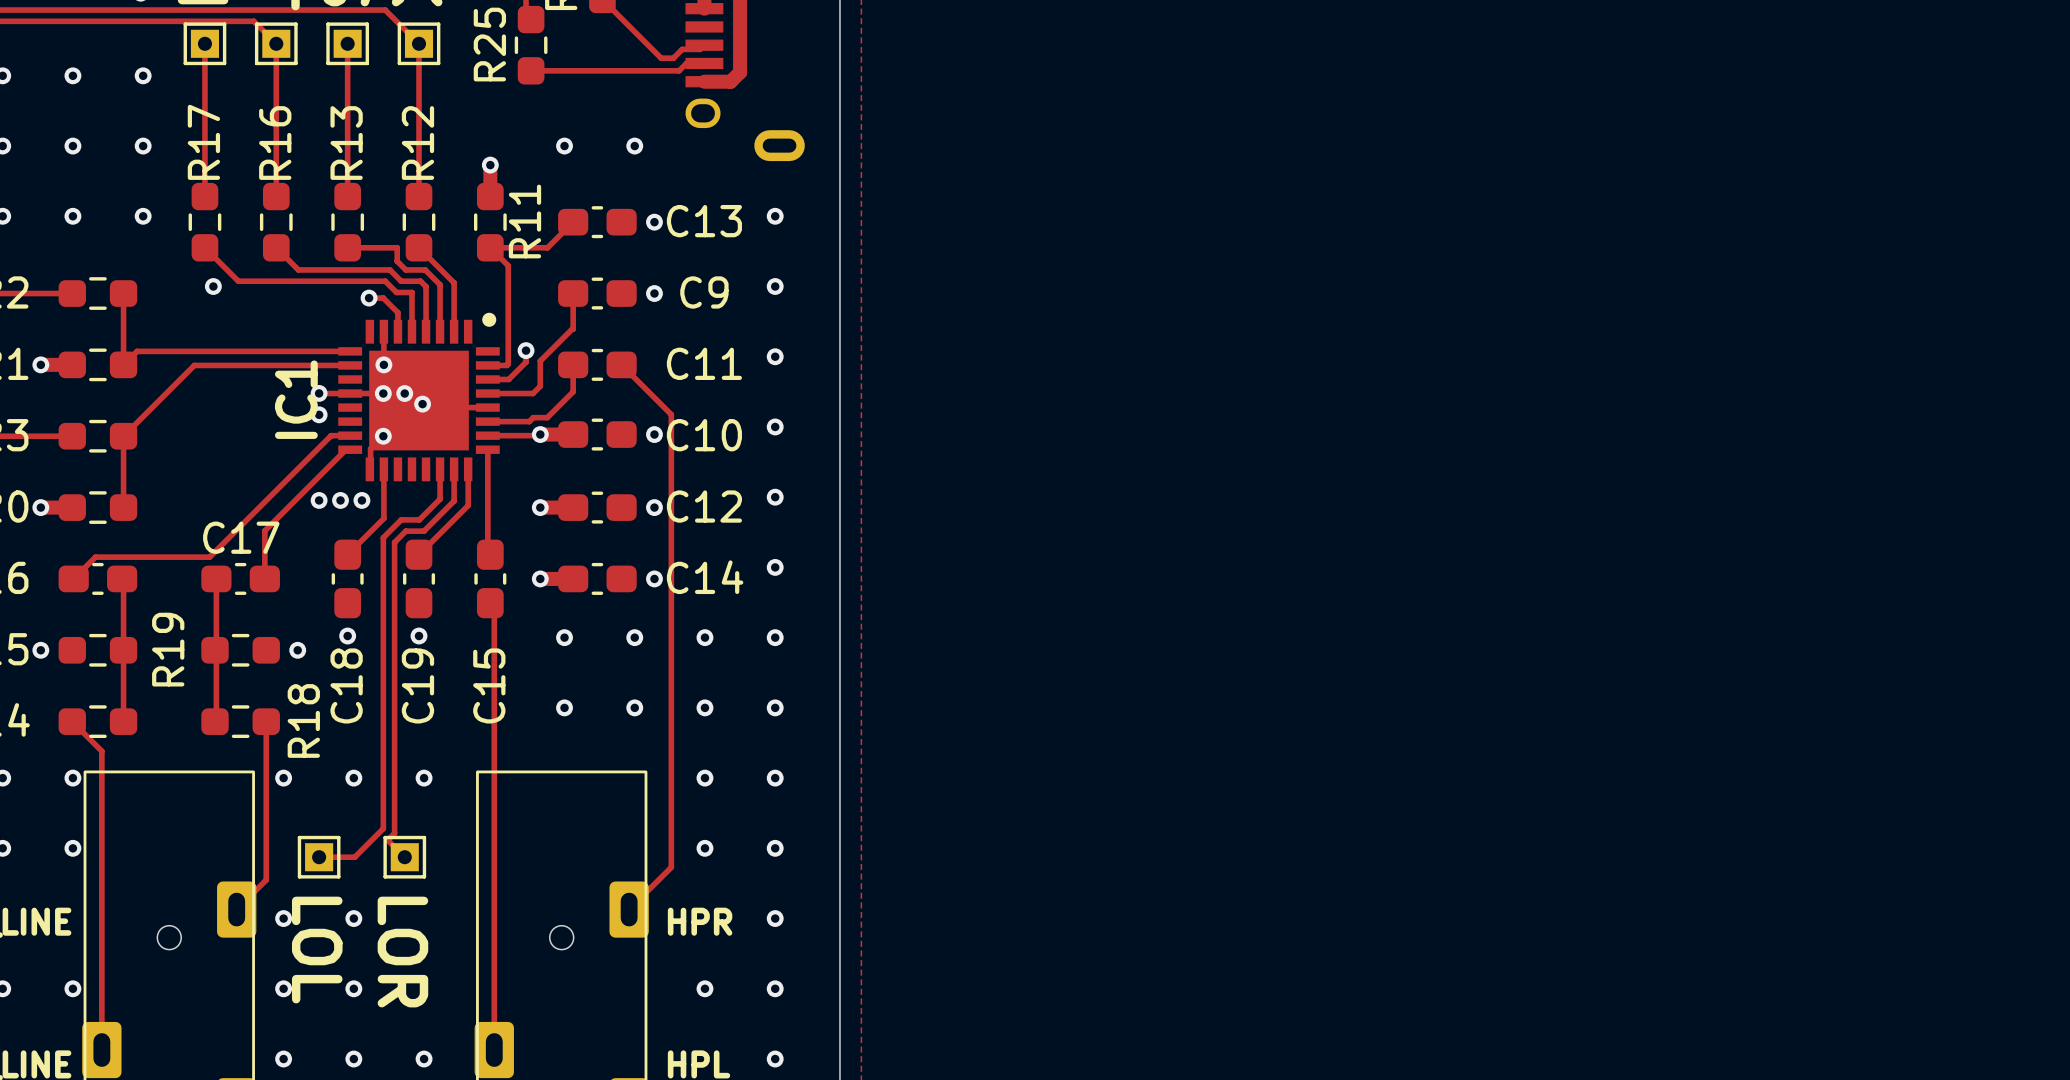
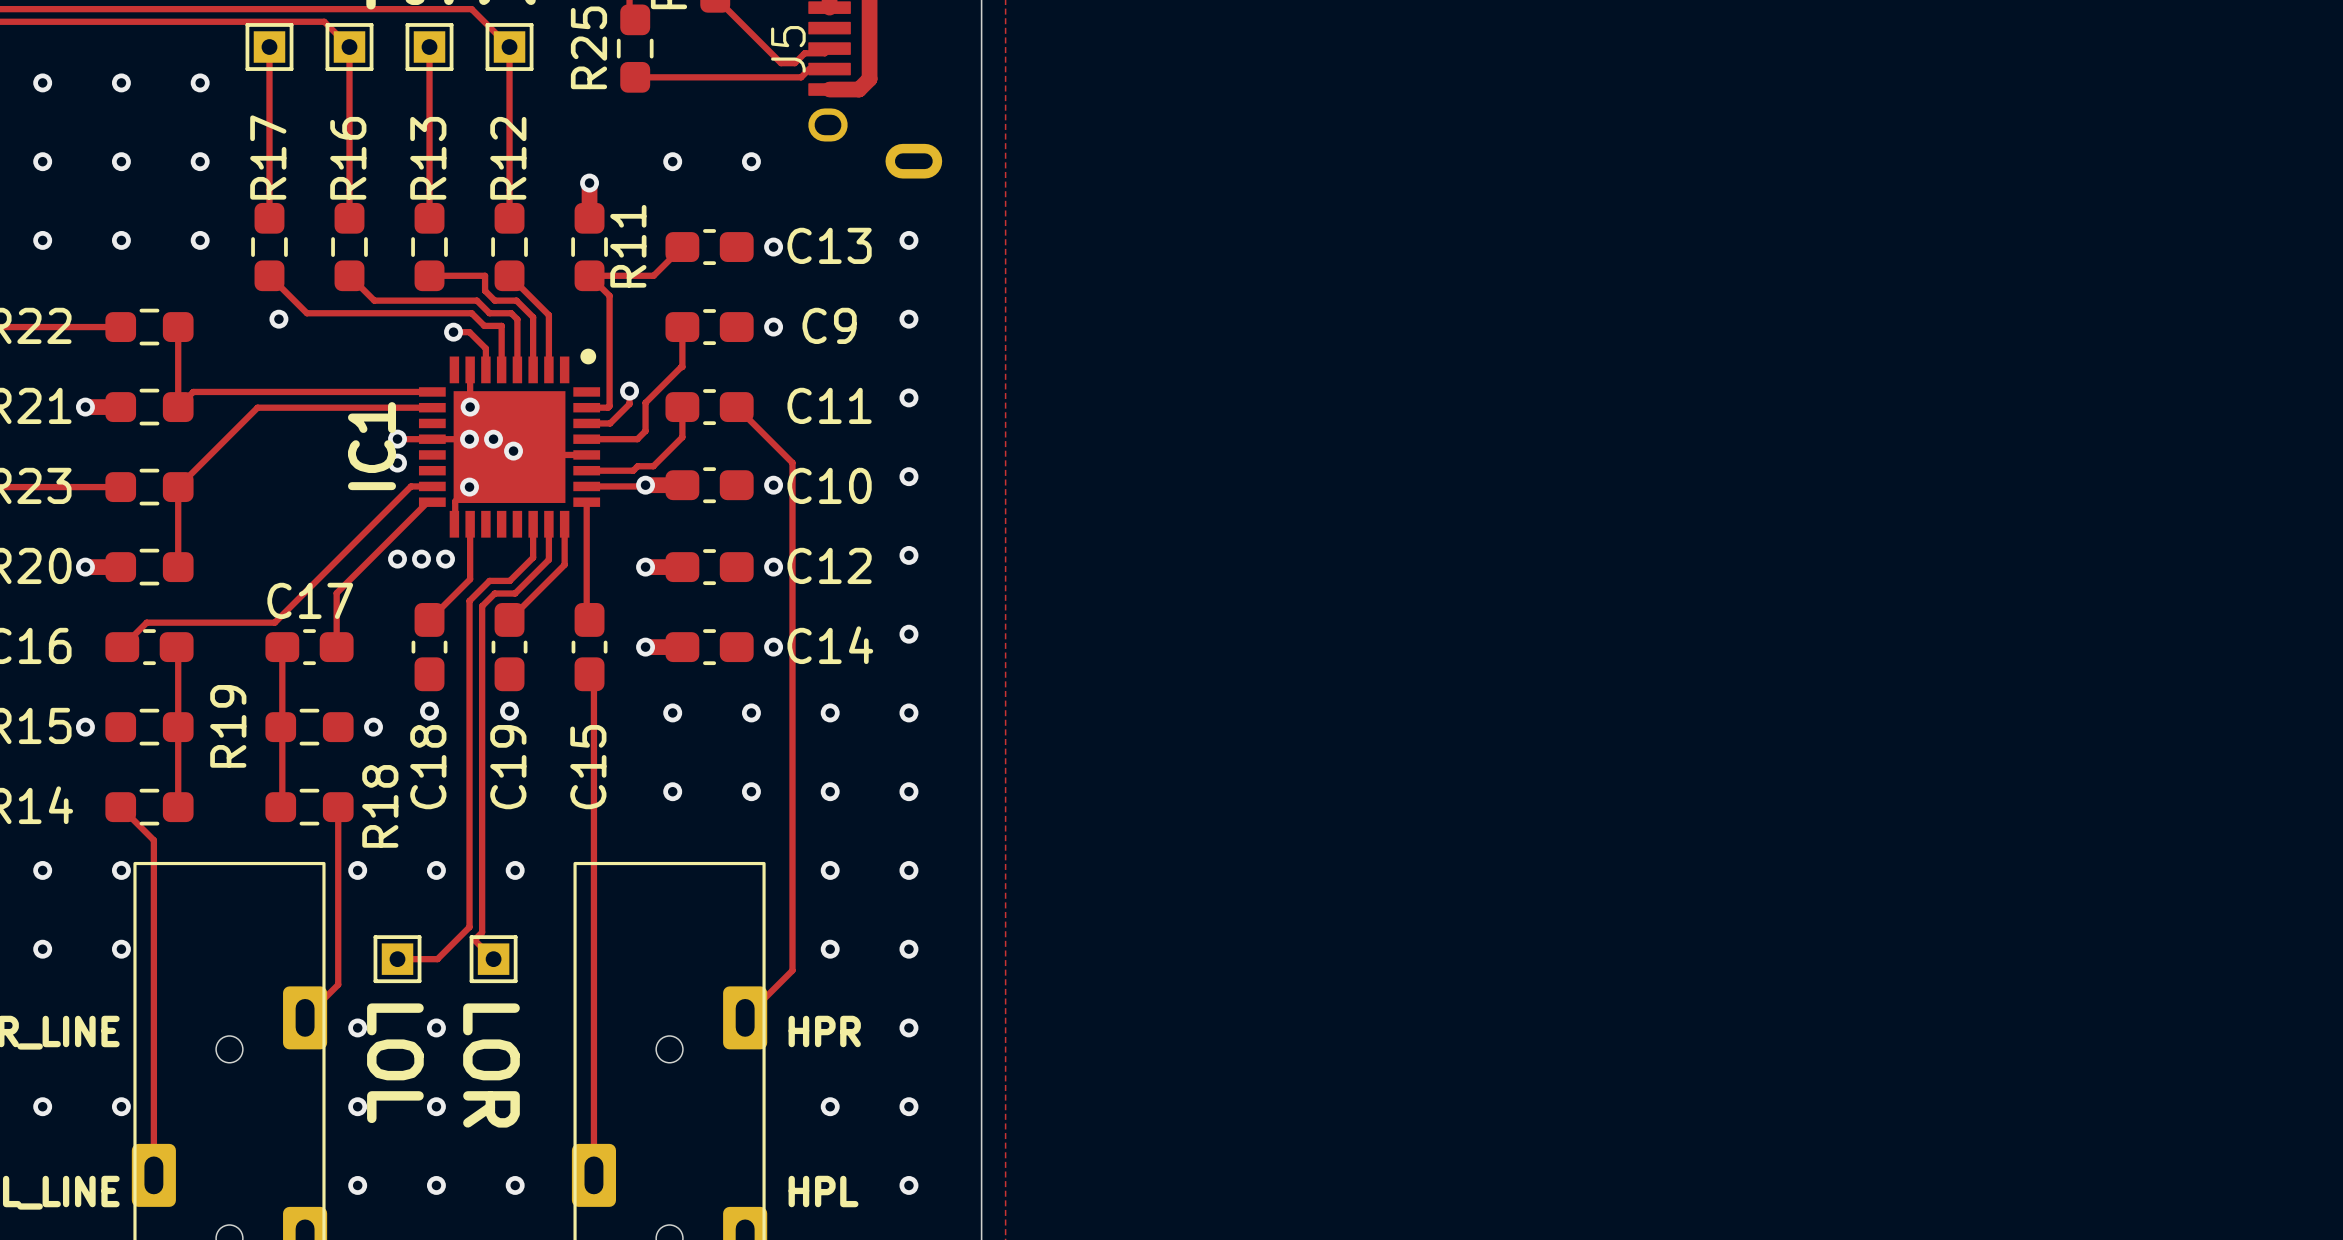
J5 name: none -> J5 (788, 49)

